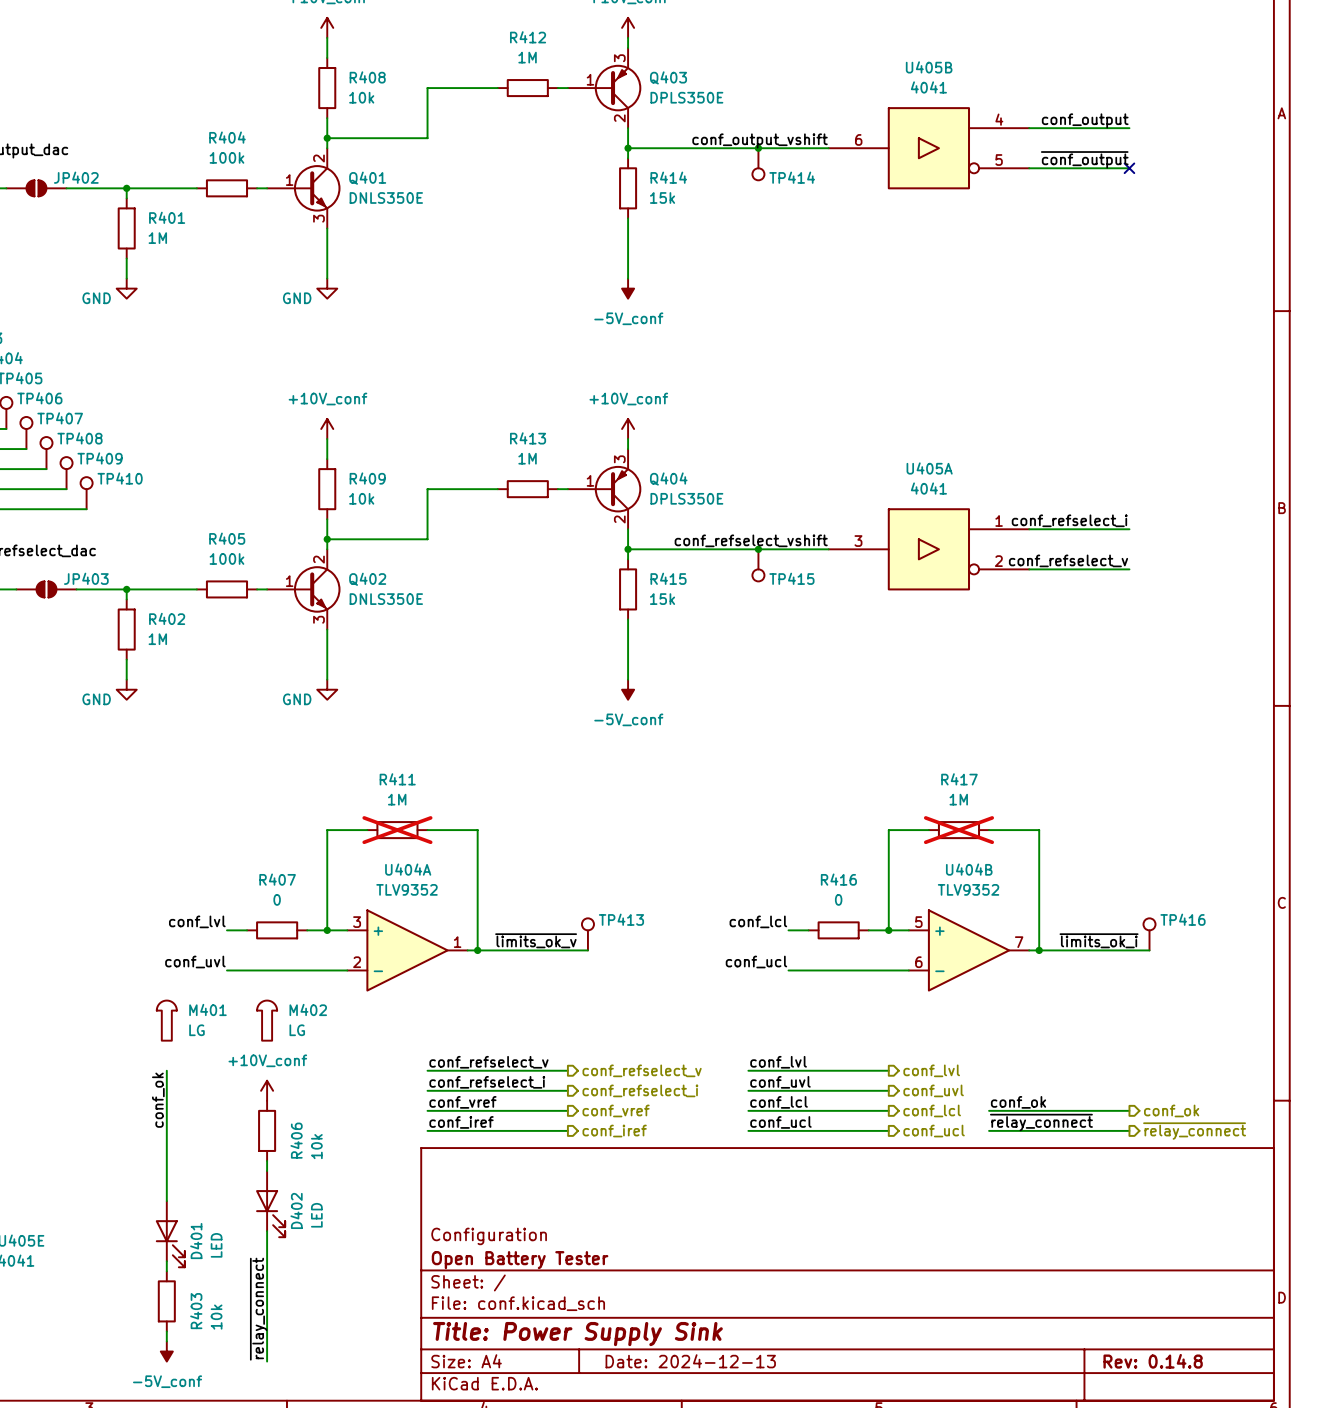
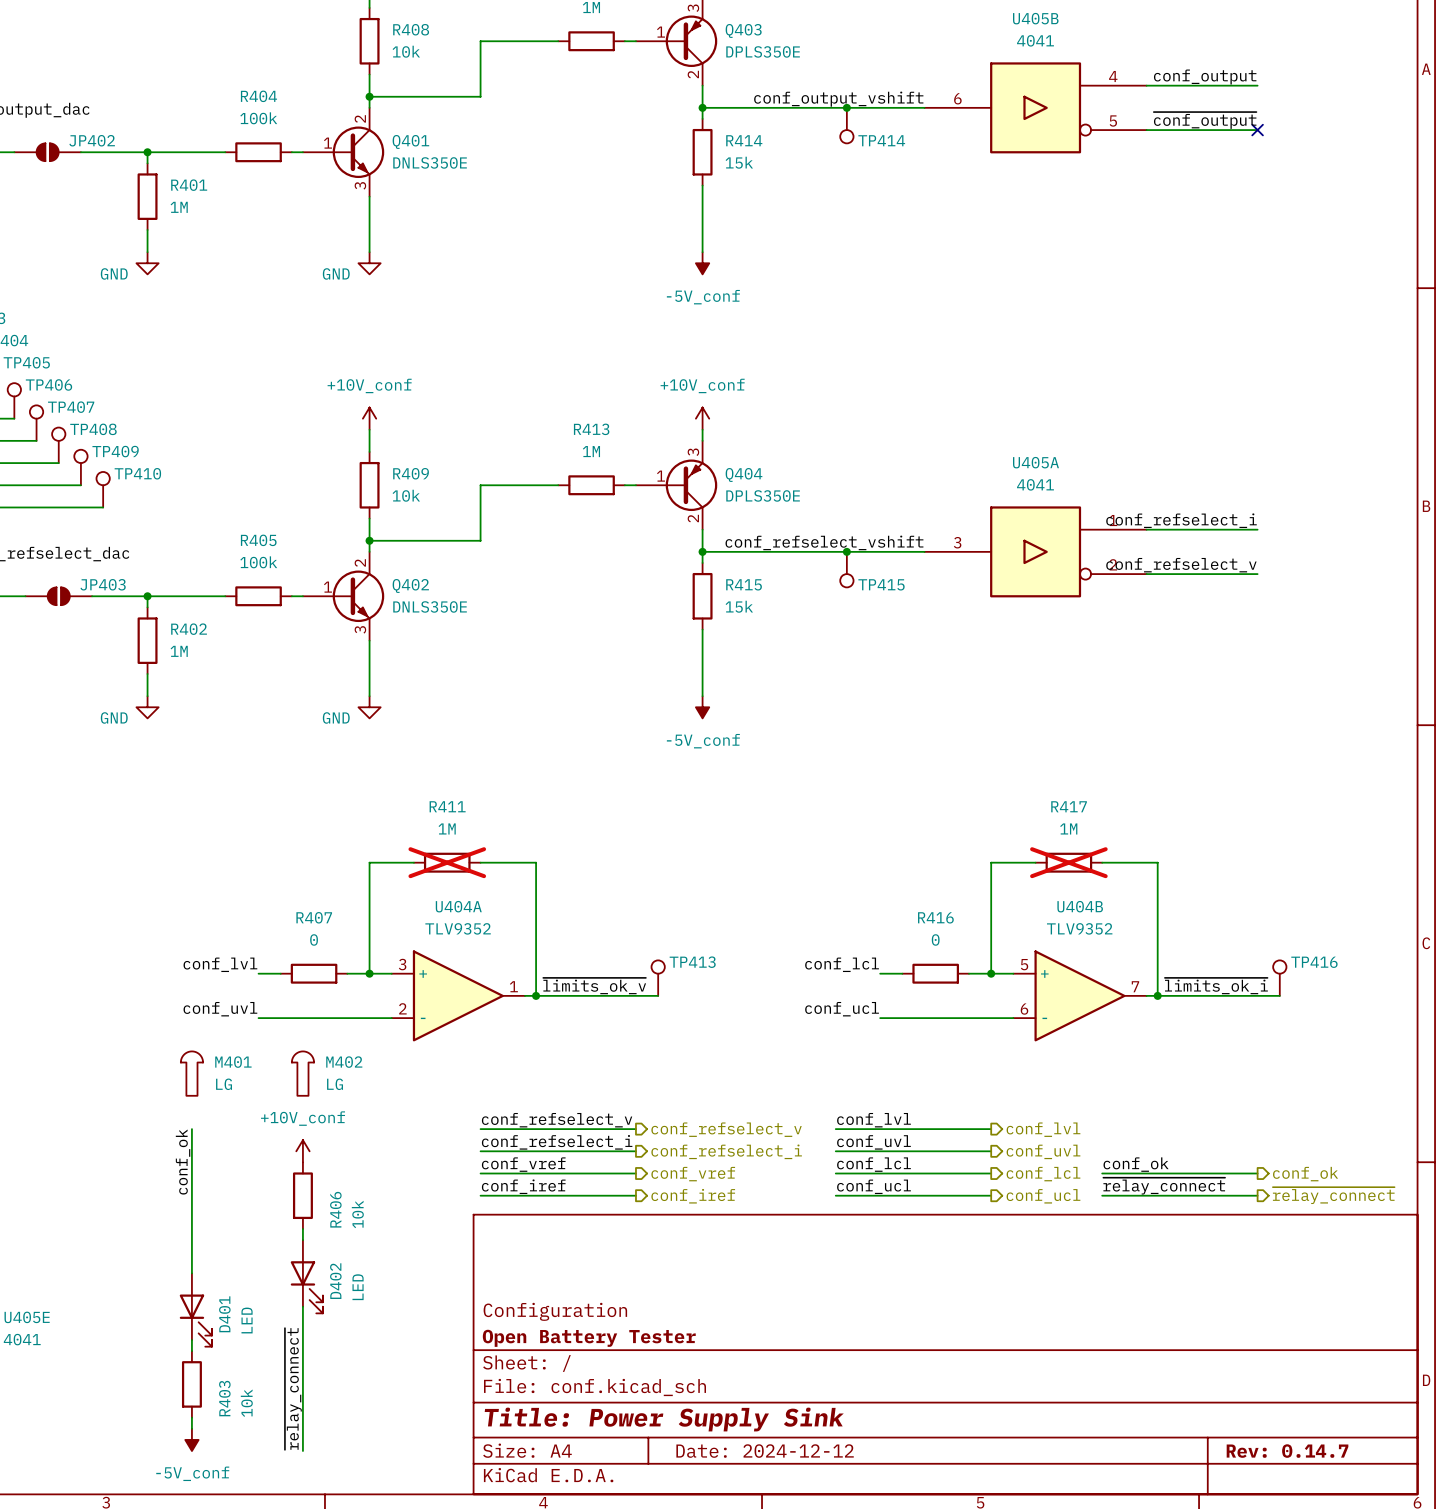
title block: Date: 2024-12-13 (690, 1361) -> Date: 2024-12-12 (765, 1451)
title block: Rev: 0.14.8 (1153, 1361) -> Rev: 0.14.7 (1287, 1451)

